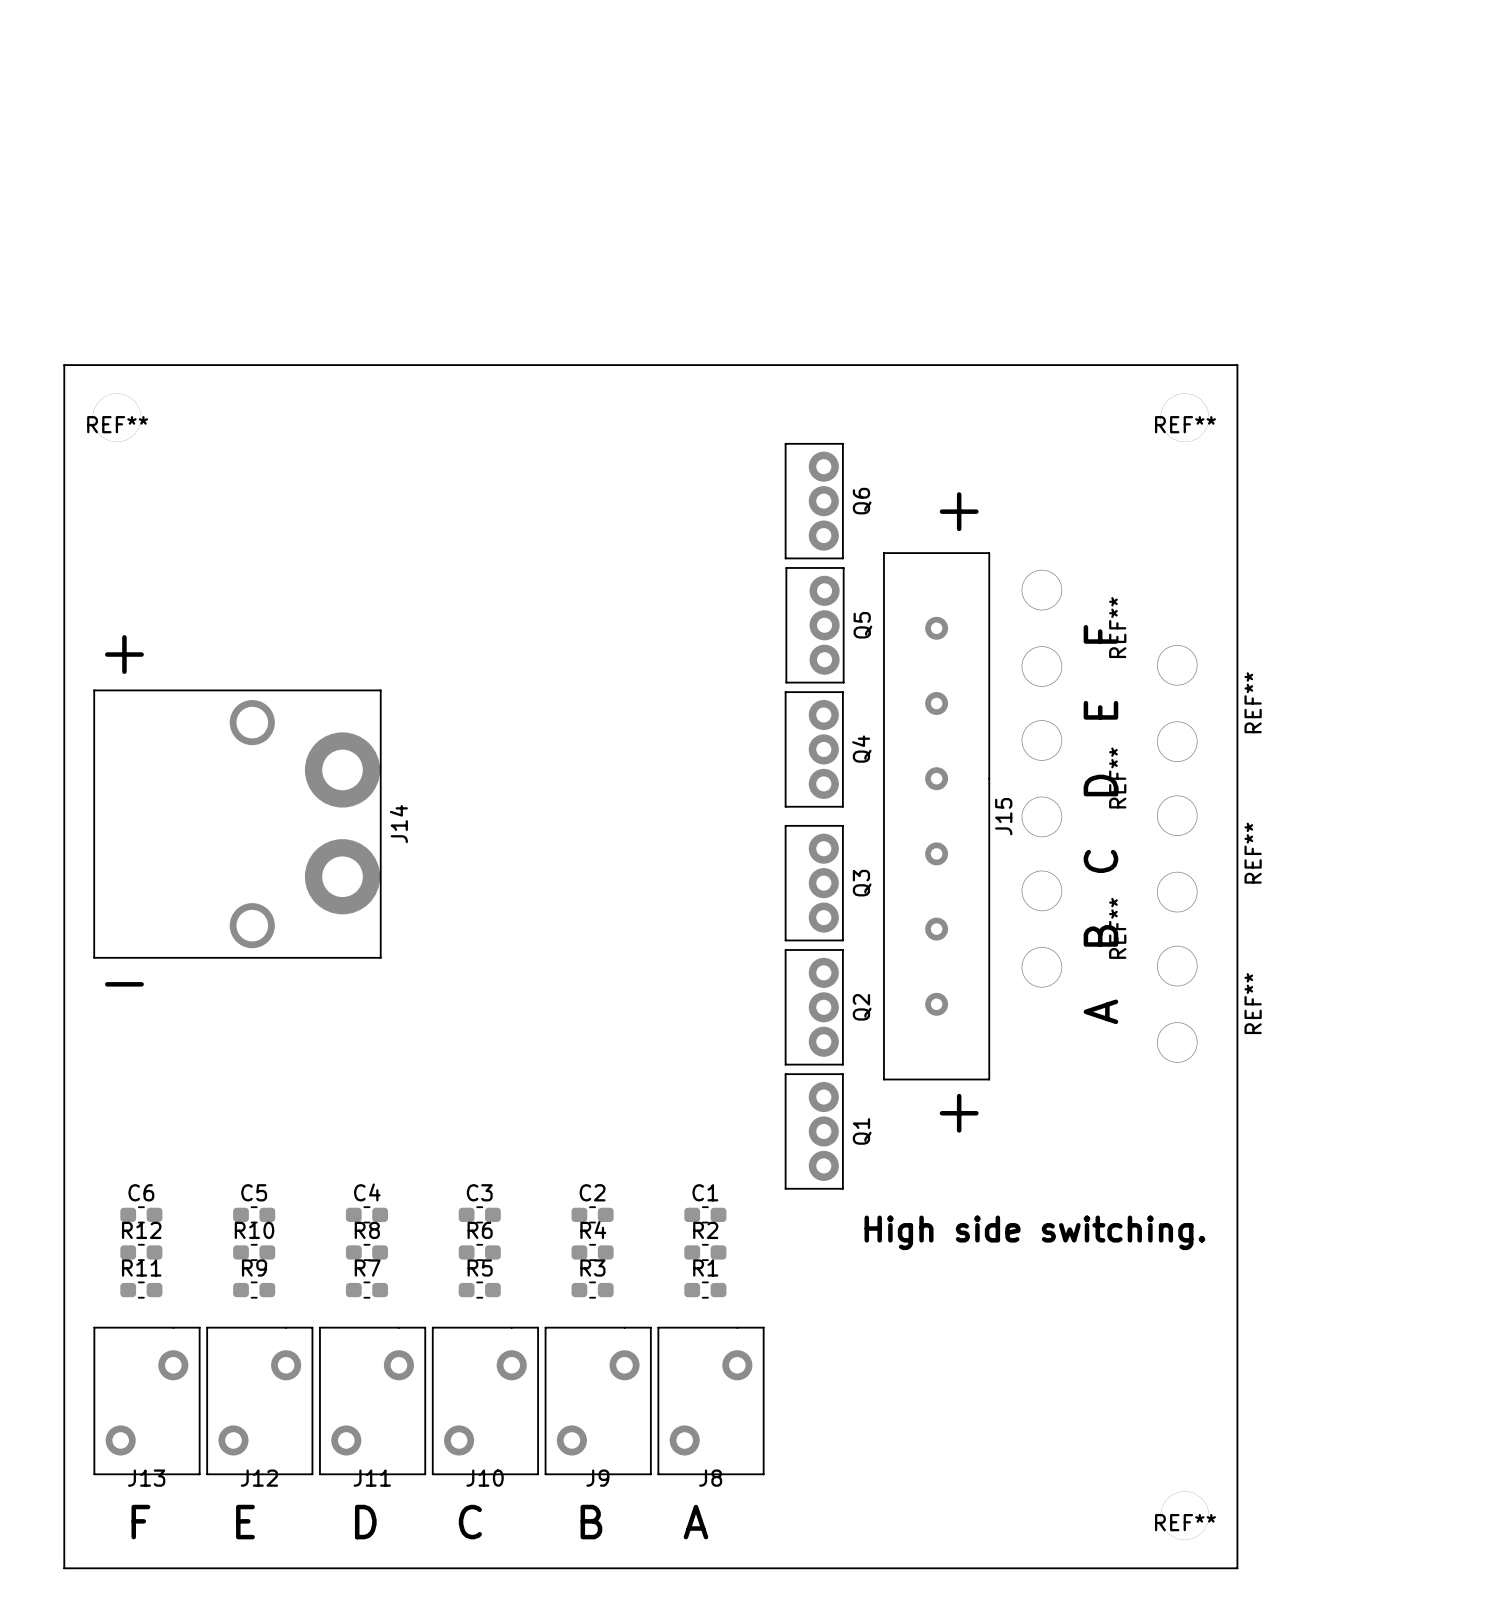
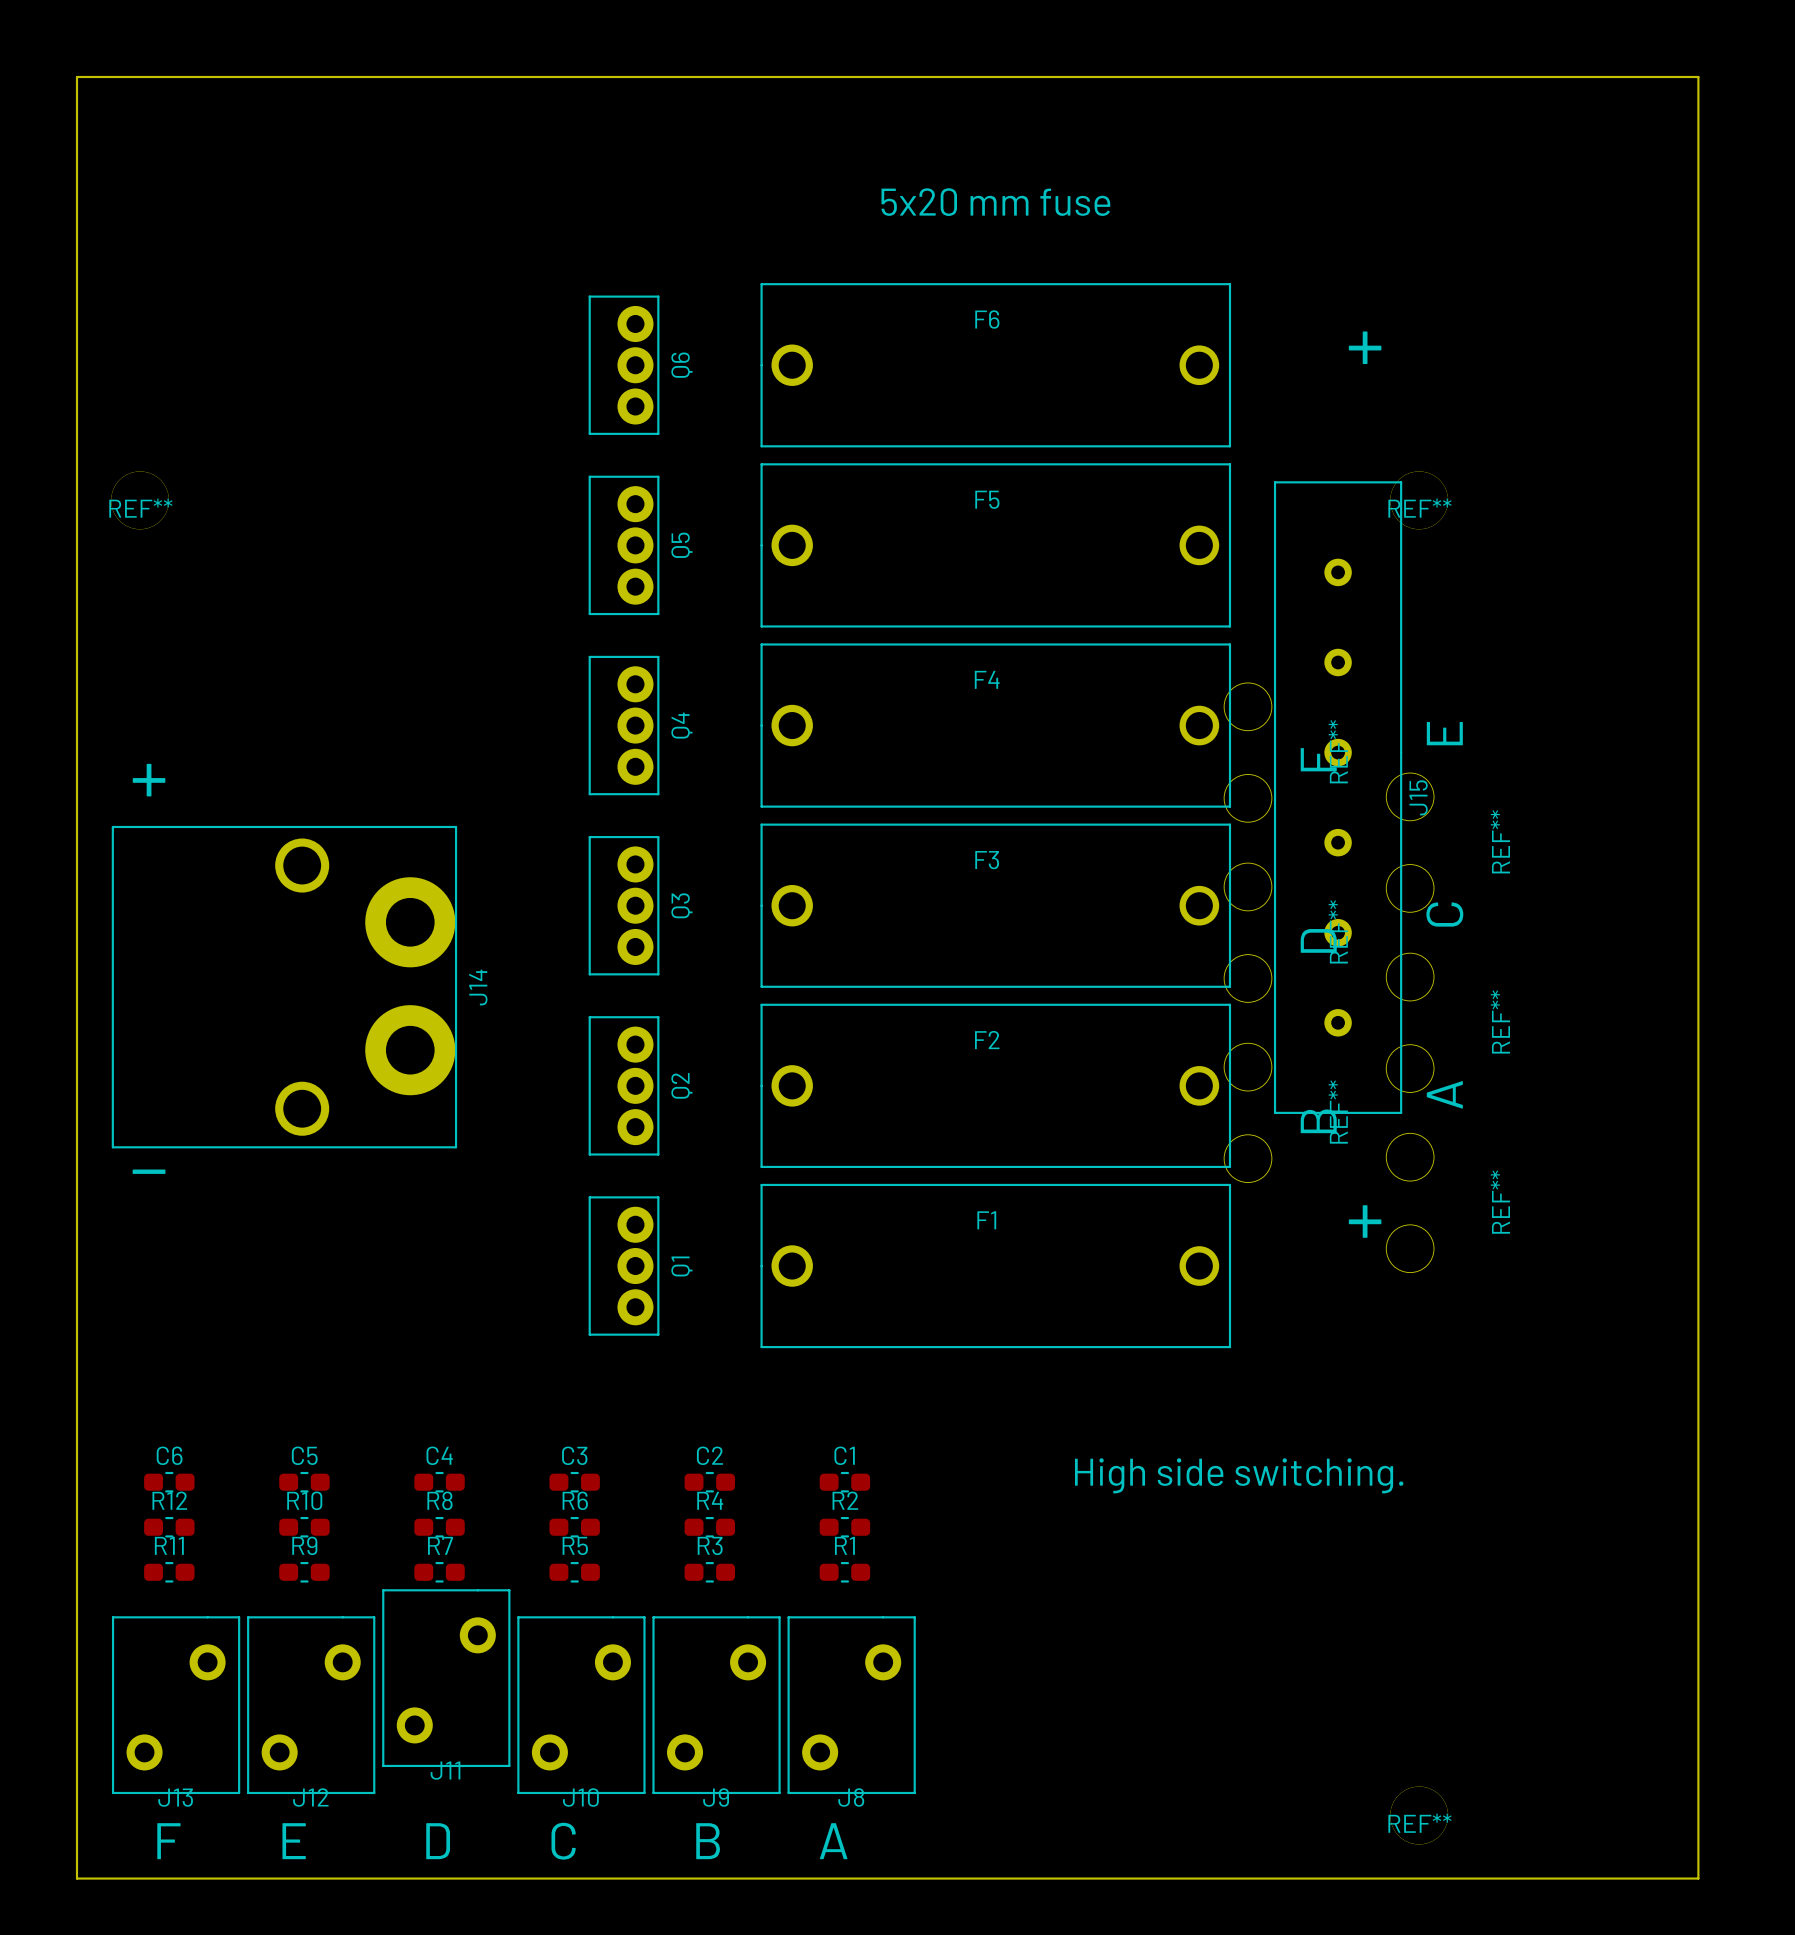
text: none -> 5x20 mm fuse (995, 202)
text: none -> + (1365, 347)
F6: none -> (995, 365)
board edge: (64, 365) (1237, 365) (1237, 1568) -> (76, 437) (76, 76) (1698, 76) (1698, 1878) (1482, 1878)
F5: none -> (995, 545)
Q6 position: (814, 501) -> (624, 365)
text: + (959, 511) -> none
F4: none -> (995, 725)
Q5 position: (815, 625) -> (624, 545)
text position: E (1100, 710) -> E (1444, 733)
Q4 position: (814, 749) -> (624, 725)
F3: none -> (995, 905)
J15 position: (936, 816) -> (1338, 797)
text position: C (1100, 861) -> C (1444, 914)
Q3 position: (814, 883) -> (624, 905)
F2: none -> (995, 1085)
Q2 position: (814, 1007) -> (624, 1085)
text position: A (1100, 1011) -> A (1444, 1094)
F1: none -> (995, 1266)
text position: + (959, 1113) -> + (1365, 1221)
Q1 position: (814, 1131) -> (624, 1266)
C6 position: (141, 1214) -> (169, 1482)
C5 position: (254, 1214) -> (304, 1482)
C4 position: (366, 1214) -> (439, 1482)
C3 position: (479, 1214) -> (574, 1482)
C2 position: (592, 1214) -> (709, 1482)
C1 position: (705, 1214) -> (844, 1482)
R12 position: (141, 1252) -> (169, 1527)
R10 position: (254, 1252) -> (304, 1527)
R8 position: (366, 1252) -> (439, 1527)
R6 position: (479, 1252) -> (574, 1527)
R4 position: (592, 1252) -> (709, 1527)
R2 position: (705, 1252) -> (844, 1527)
R11 position: (141, 1290) -> (169, 1572)
R9 position: (254, 1290) -> (304, 1572)
R7 position: (366, 1290) -> (439, 1572)
R5 position: (479, 1290) -> (574, 1572)
R3 position: (592, 1290) -> (709, 1572)
R1 position: (705, 1290) -> (844, 1572)
J13 position: (147, 1400) -> (176, 1705)
J12 position: (259, 1400) -> (311, 1705)
J10 position: (485, 1400) -> (581, 1705)
J9 position: (598, 1400) -> (716, 1705)
J8 position: (711, 1400) -> (851, 1705)
text position: F (140, 1522) -> F (168, 1841)
text position: E (245, 1522) -> E (294, 1841)
text position: D (365, 1522) -> D (438, 1841)
text position: C (470, 1522) -> C (563, 1841)
text position: B (591, 1522) -> B (708, 1841)
text position: A (695, 1522) -> A (833, 1841)

